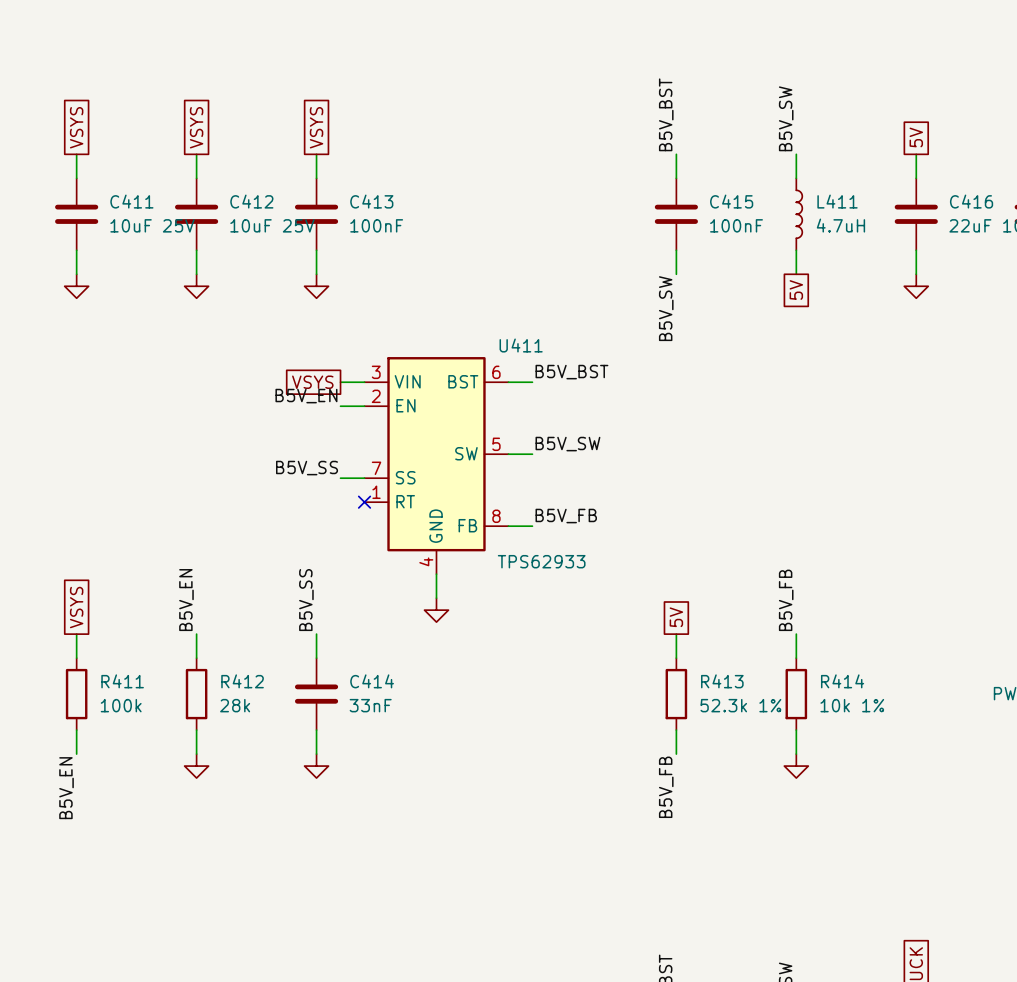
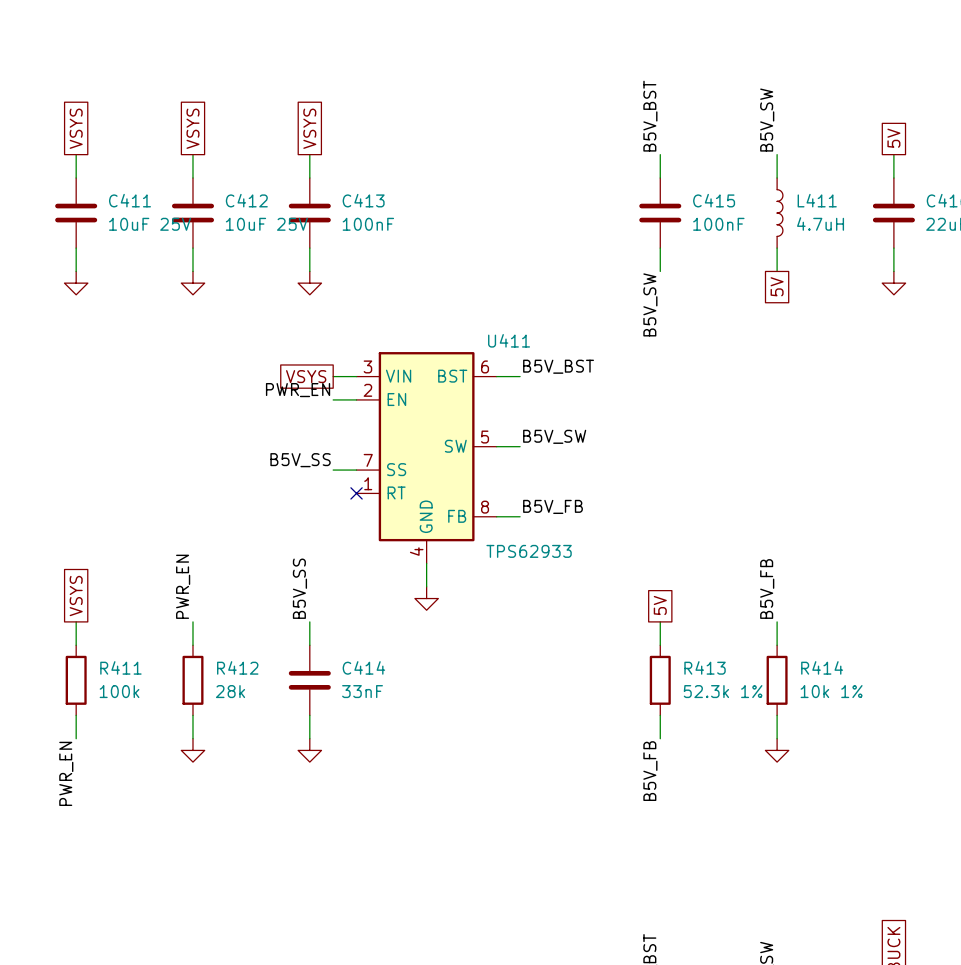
label: B5V_EN (306, 396) -> PWR_EN (298, 390)
label: B5V_EN (186, 600) -> PWR_EN (183, 586)
label: B5V_EN (66, 788) -> PWR_EN (66, 773)

